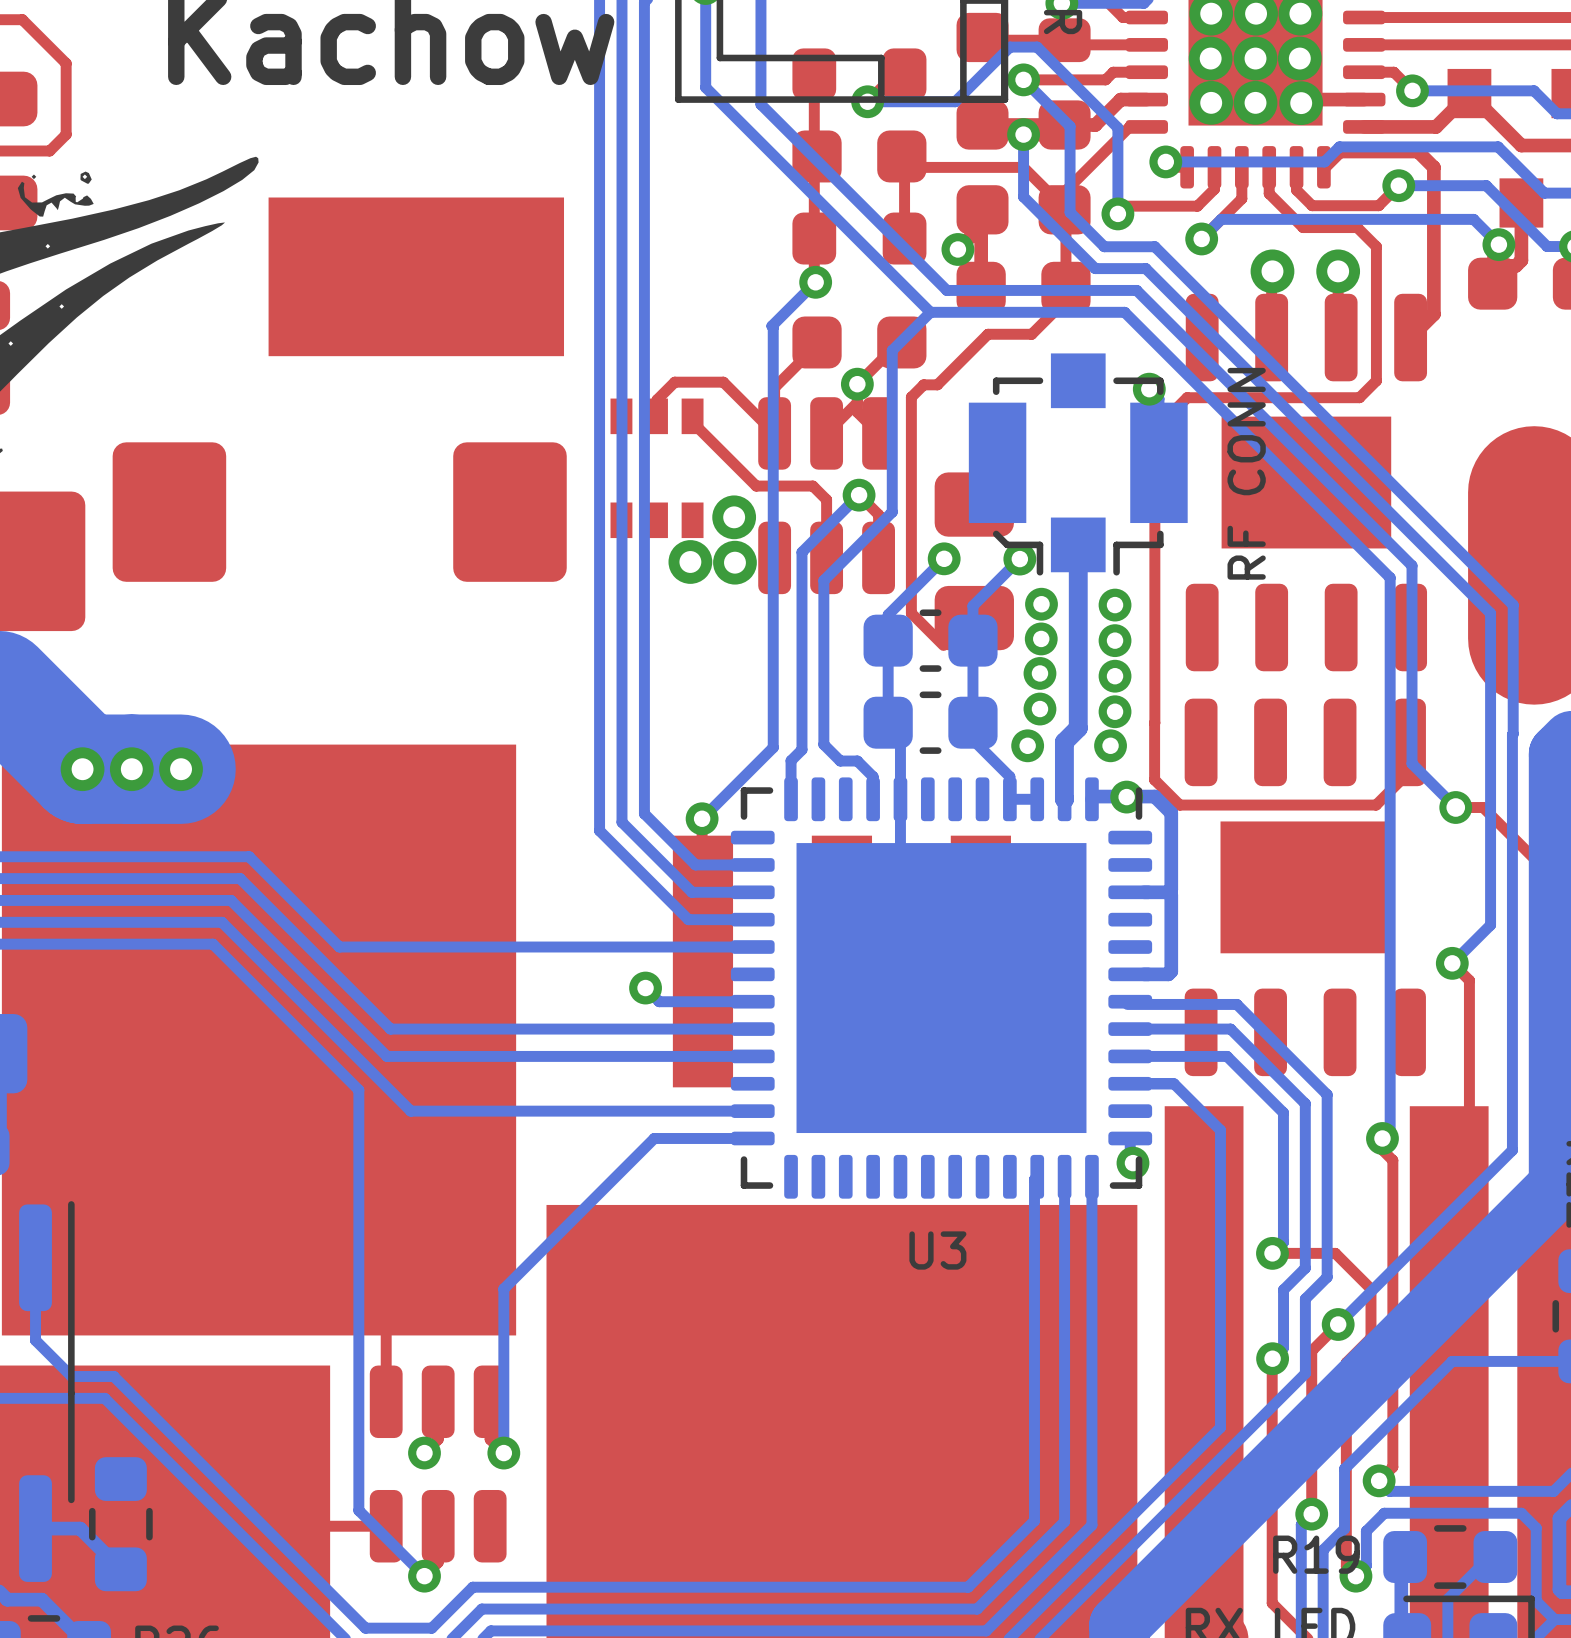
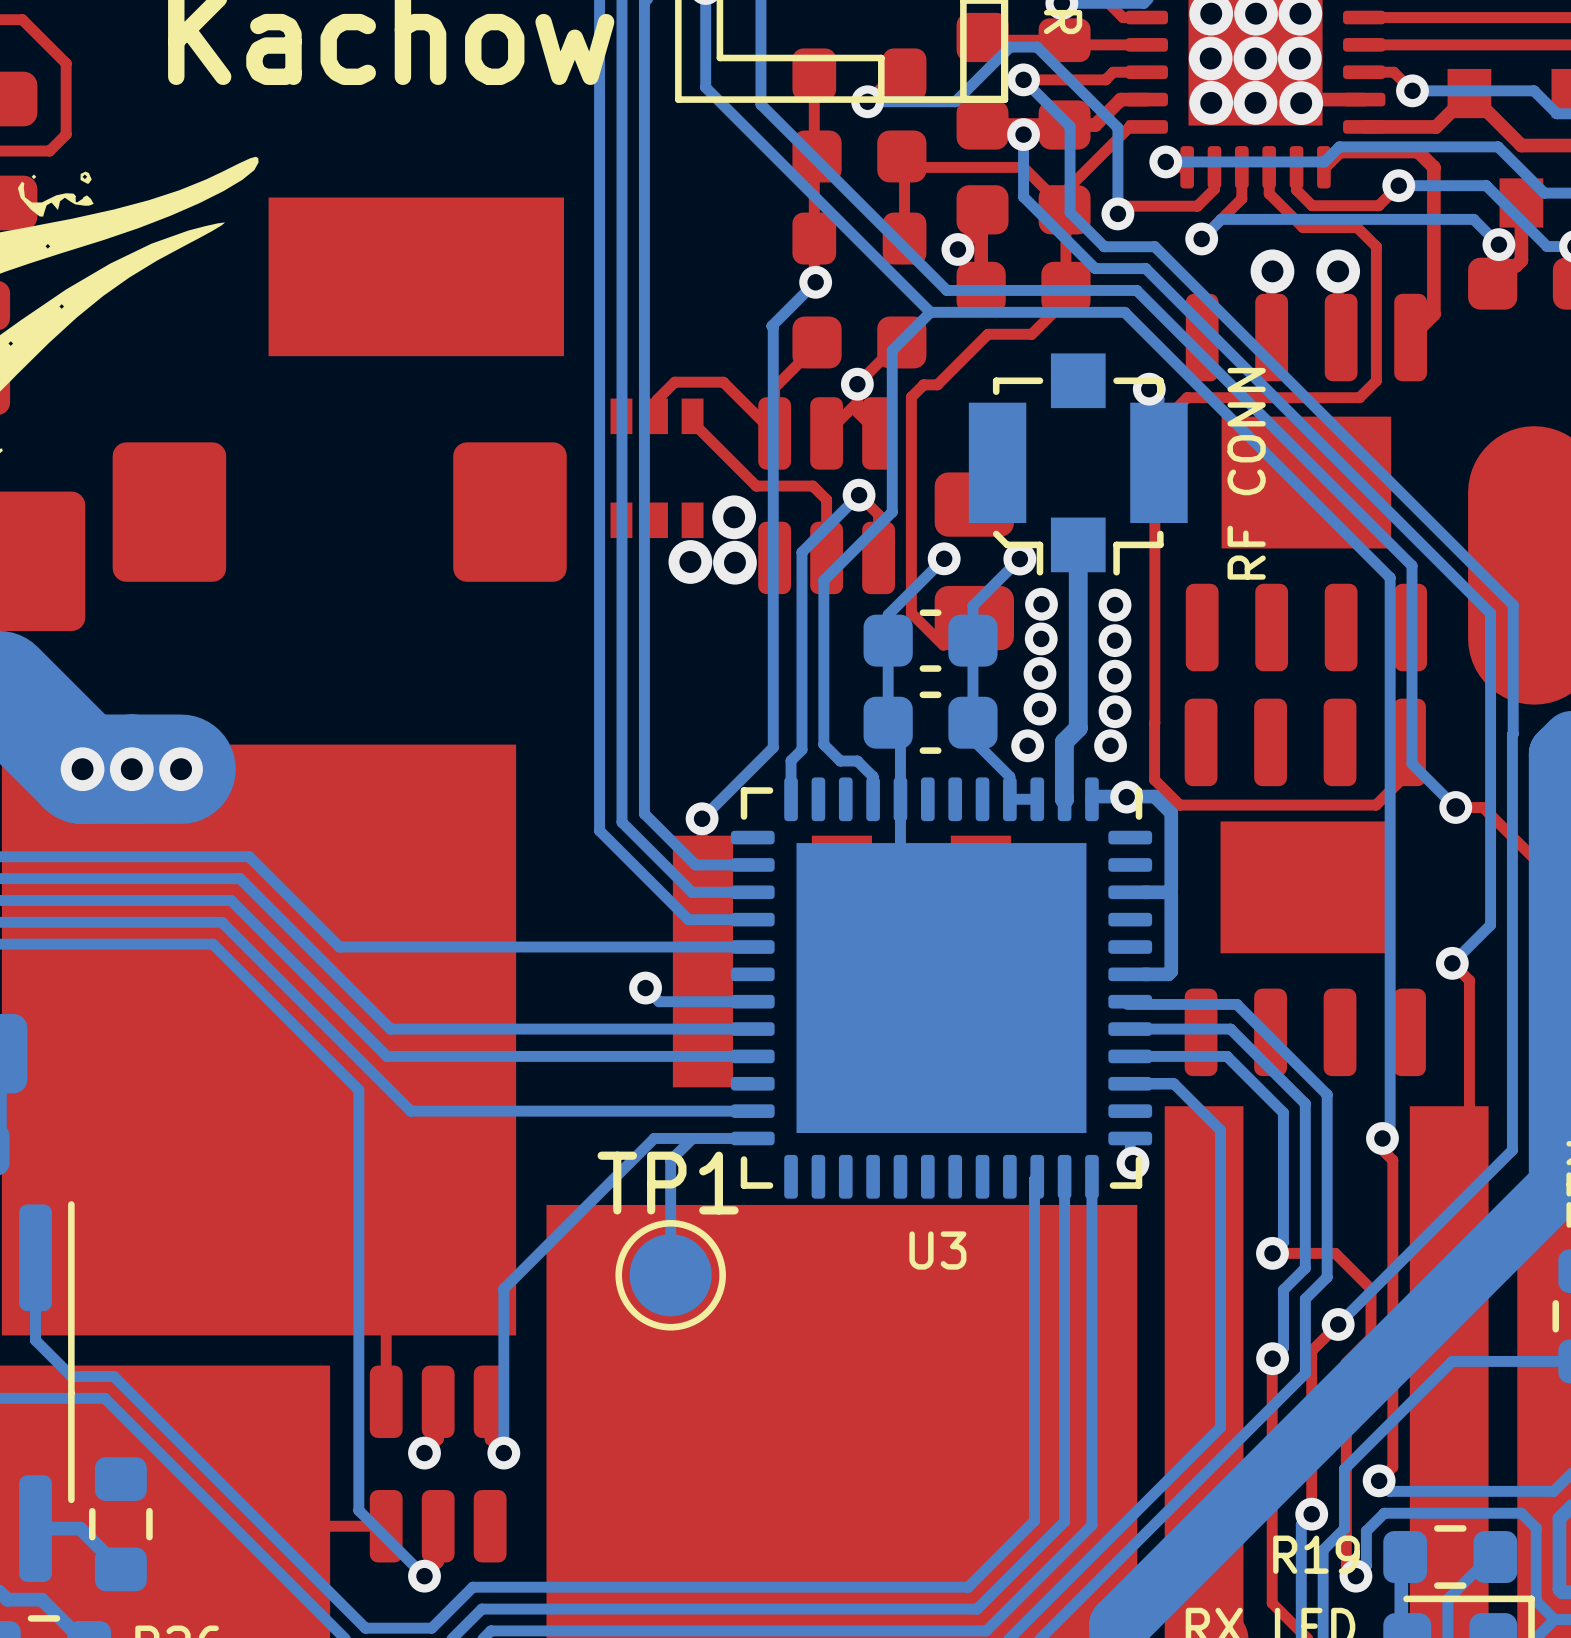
bottom track: none -> (692, 1138) (670, 1160) (670, 1275)
TP1: none -> (670, 1275)

